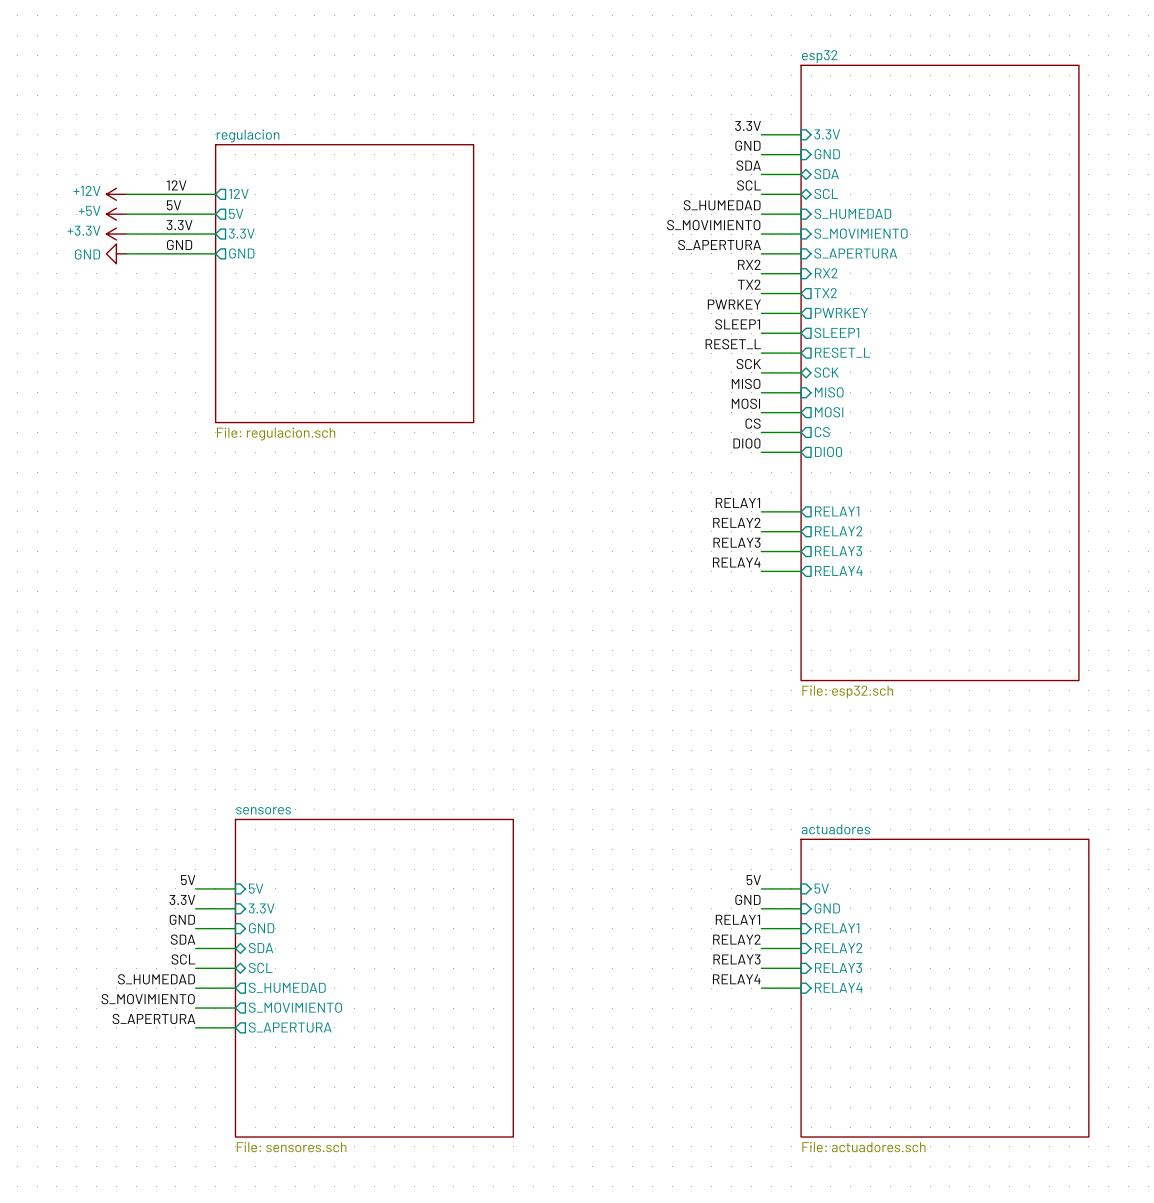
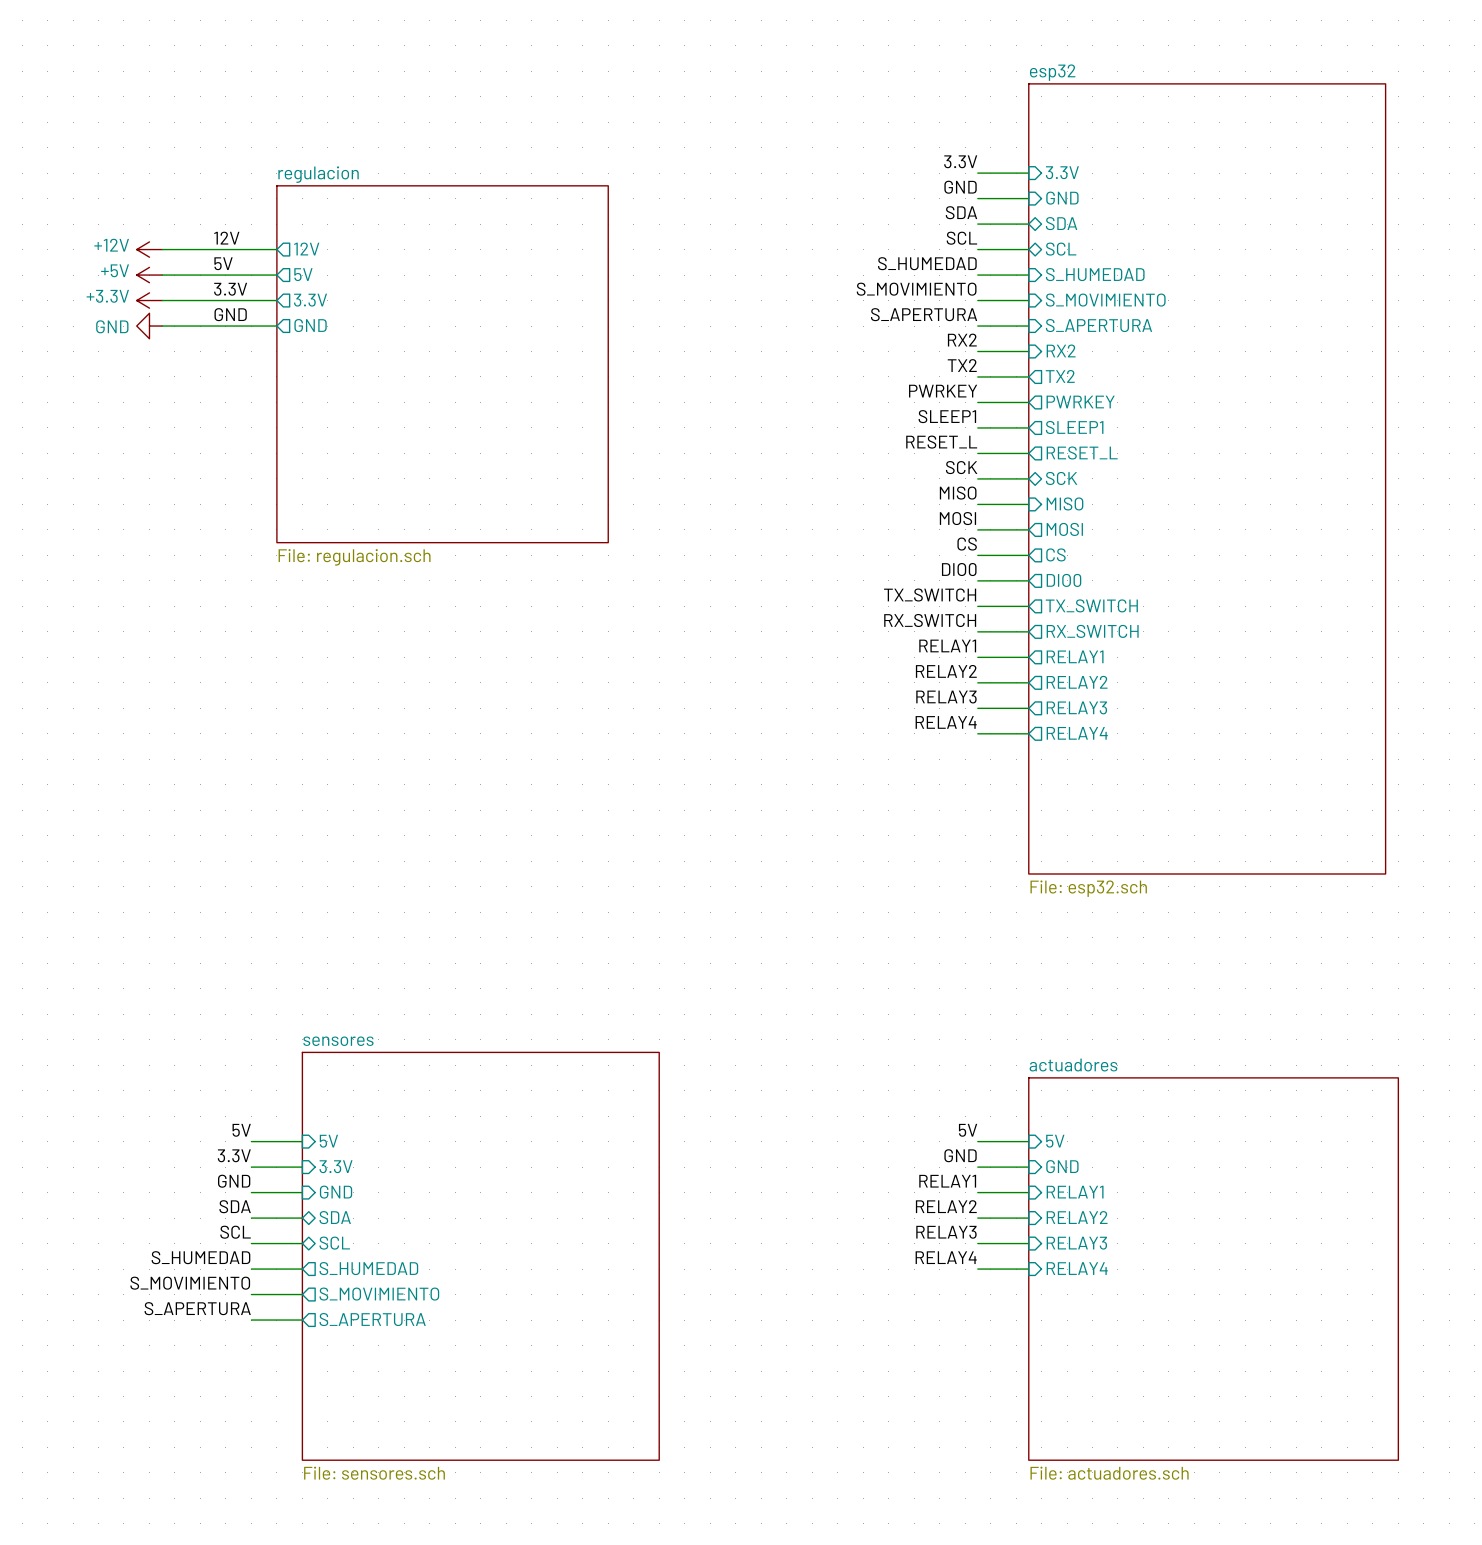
label: none -> TX_SWITCH (930, 595)
sheet pin: none -> TX_SWITCH (1091, 605)
wire: none -> (977, 606) (1028, 606)
label: none -> RX_SWITCH (930, 620)
sheet pin: none -> RX_SWITCH (1092, 631)
wire: none -> (977, 631) (1028, 631)

